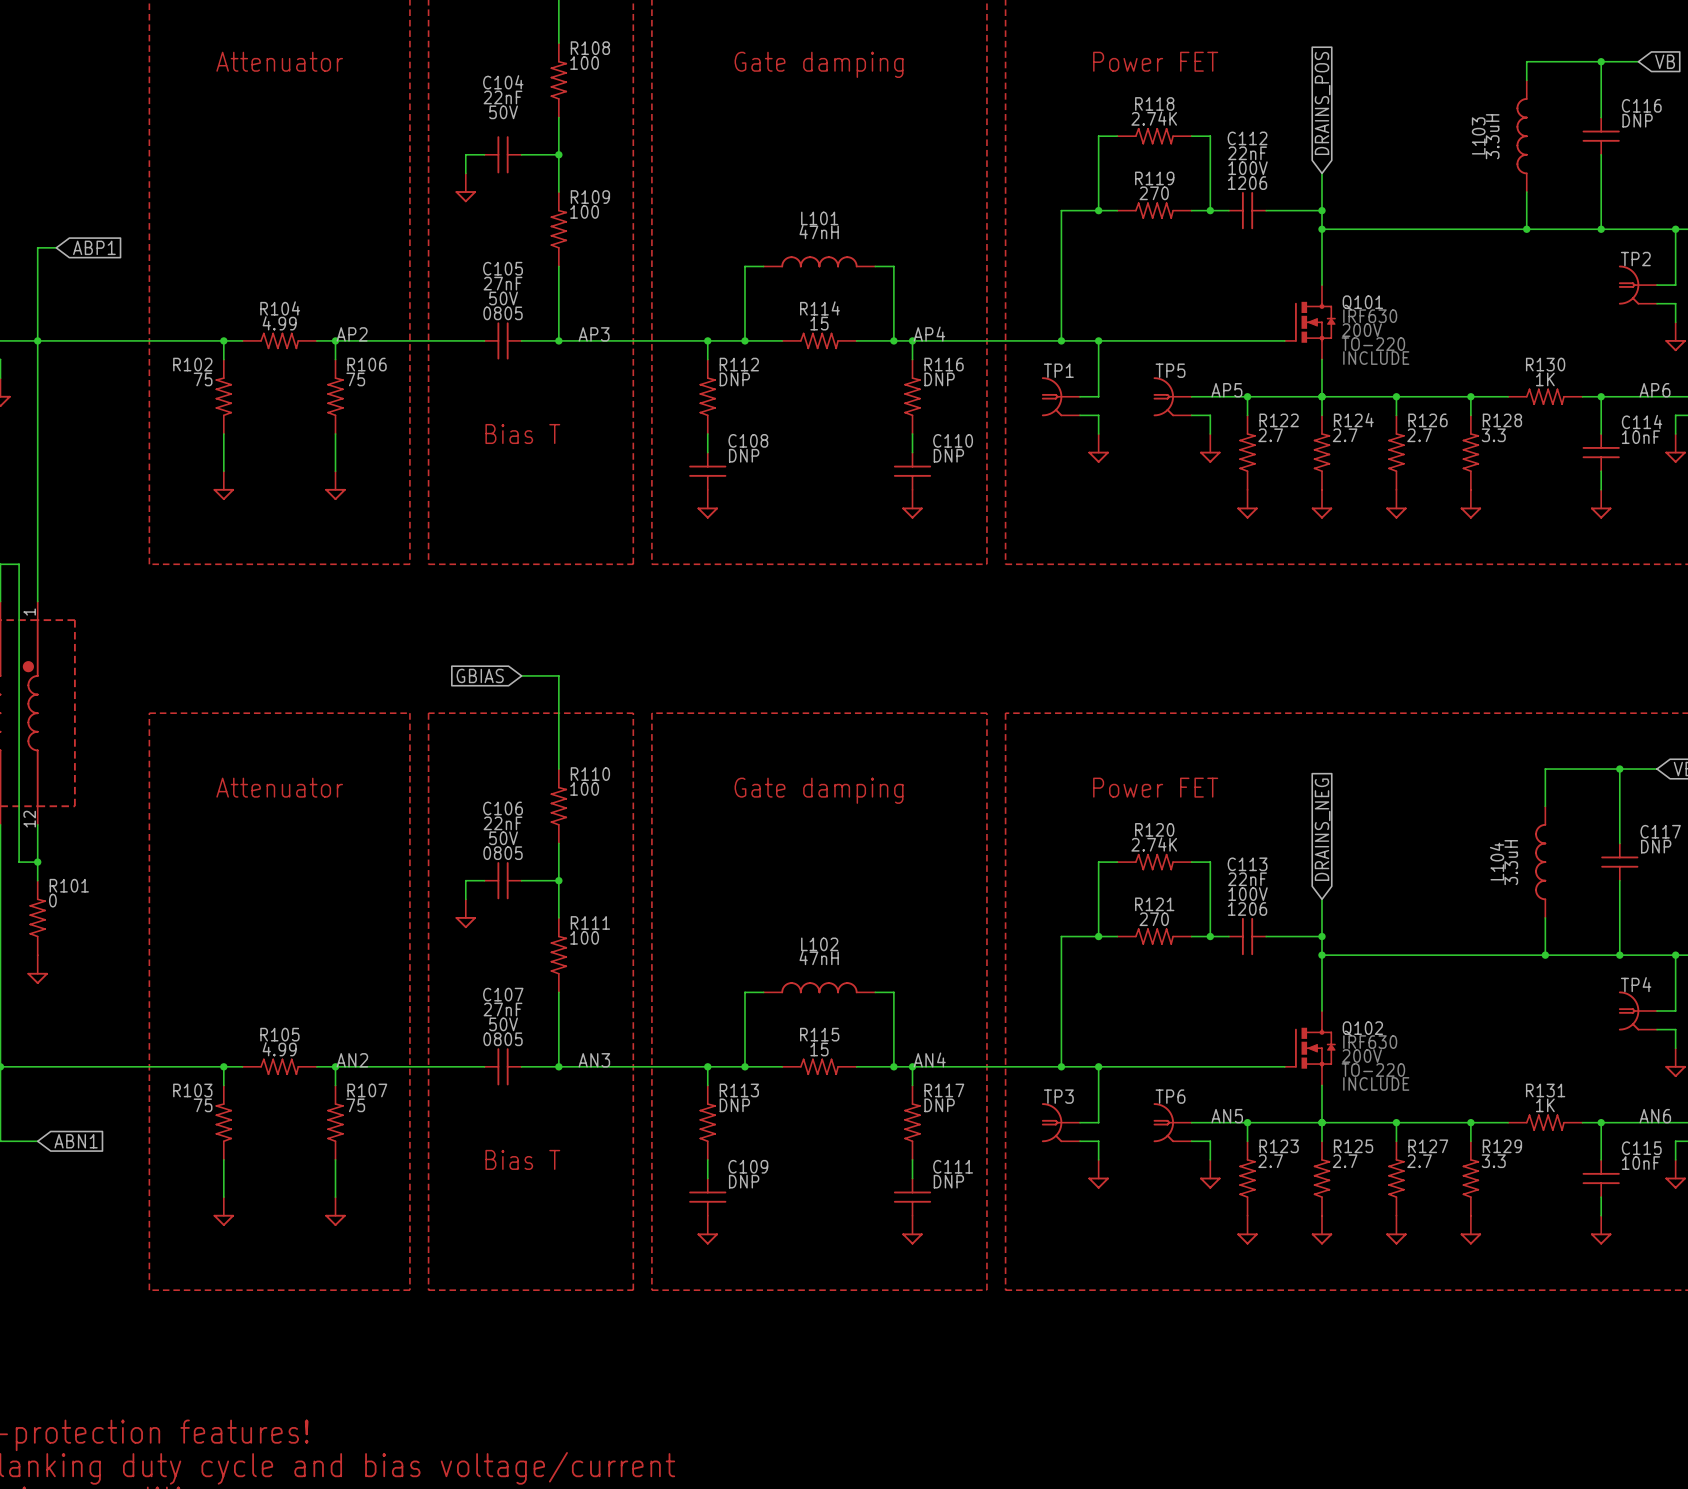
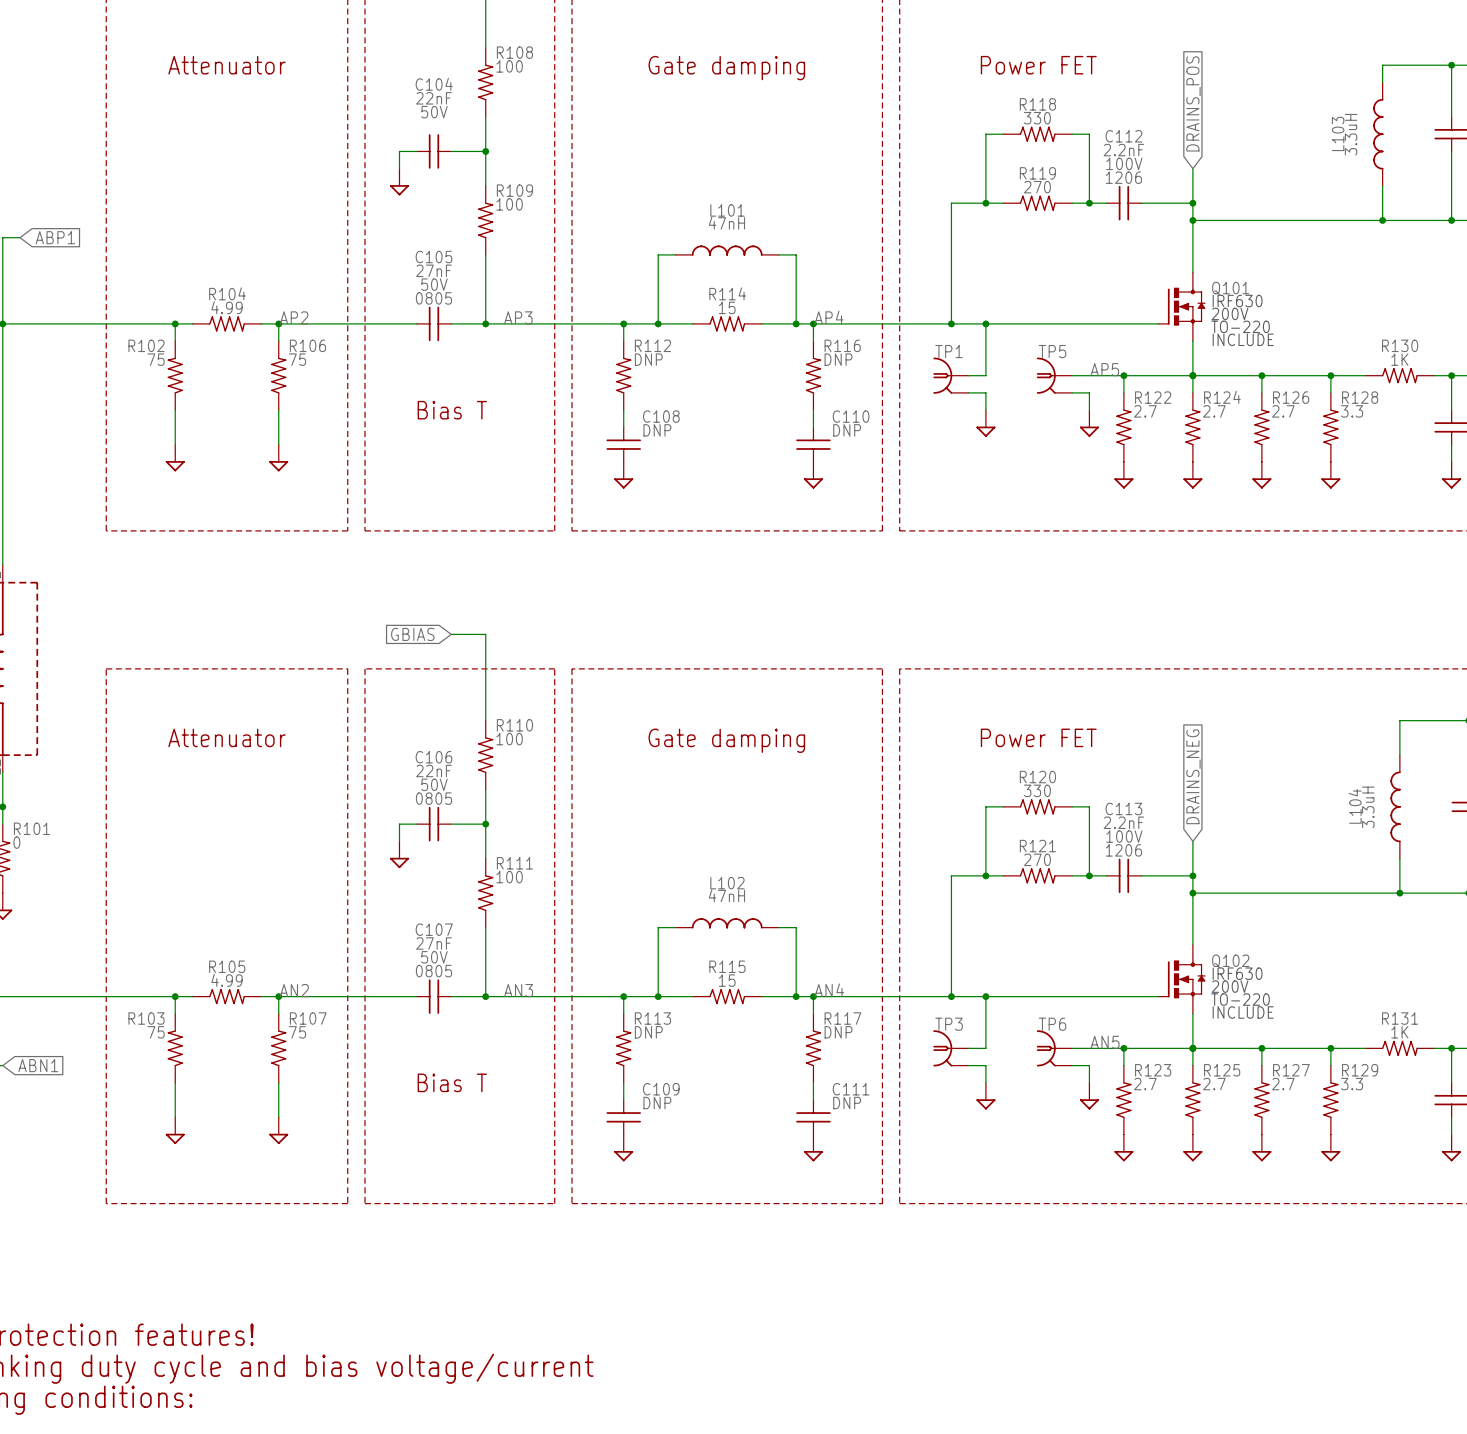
R118 value: 2.74K (1154, 118) -> 330 (1037, 118)
C112 value: 22nF (1247, 153) -> 2.2nF (1123, 150)
R120 value: 2.74K (1154, 844) -> 330 (1037, 790)
C113 value: 22nF (1247, 879) -> 2.2nF (1123, 822)

